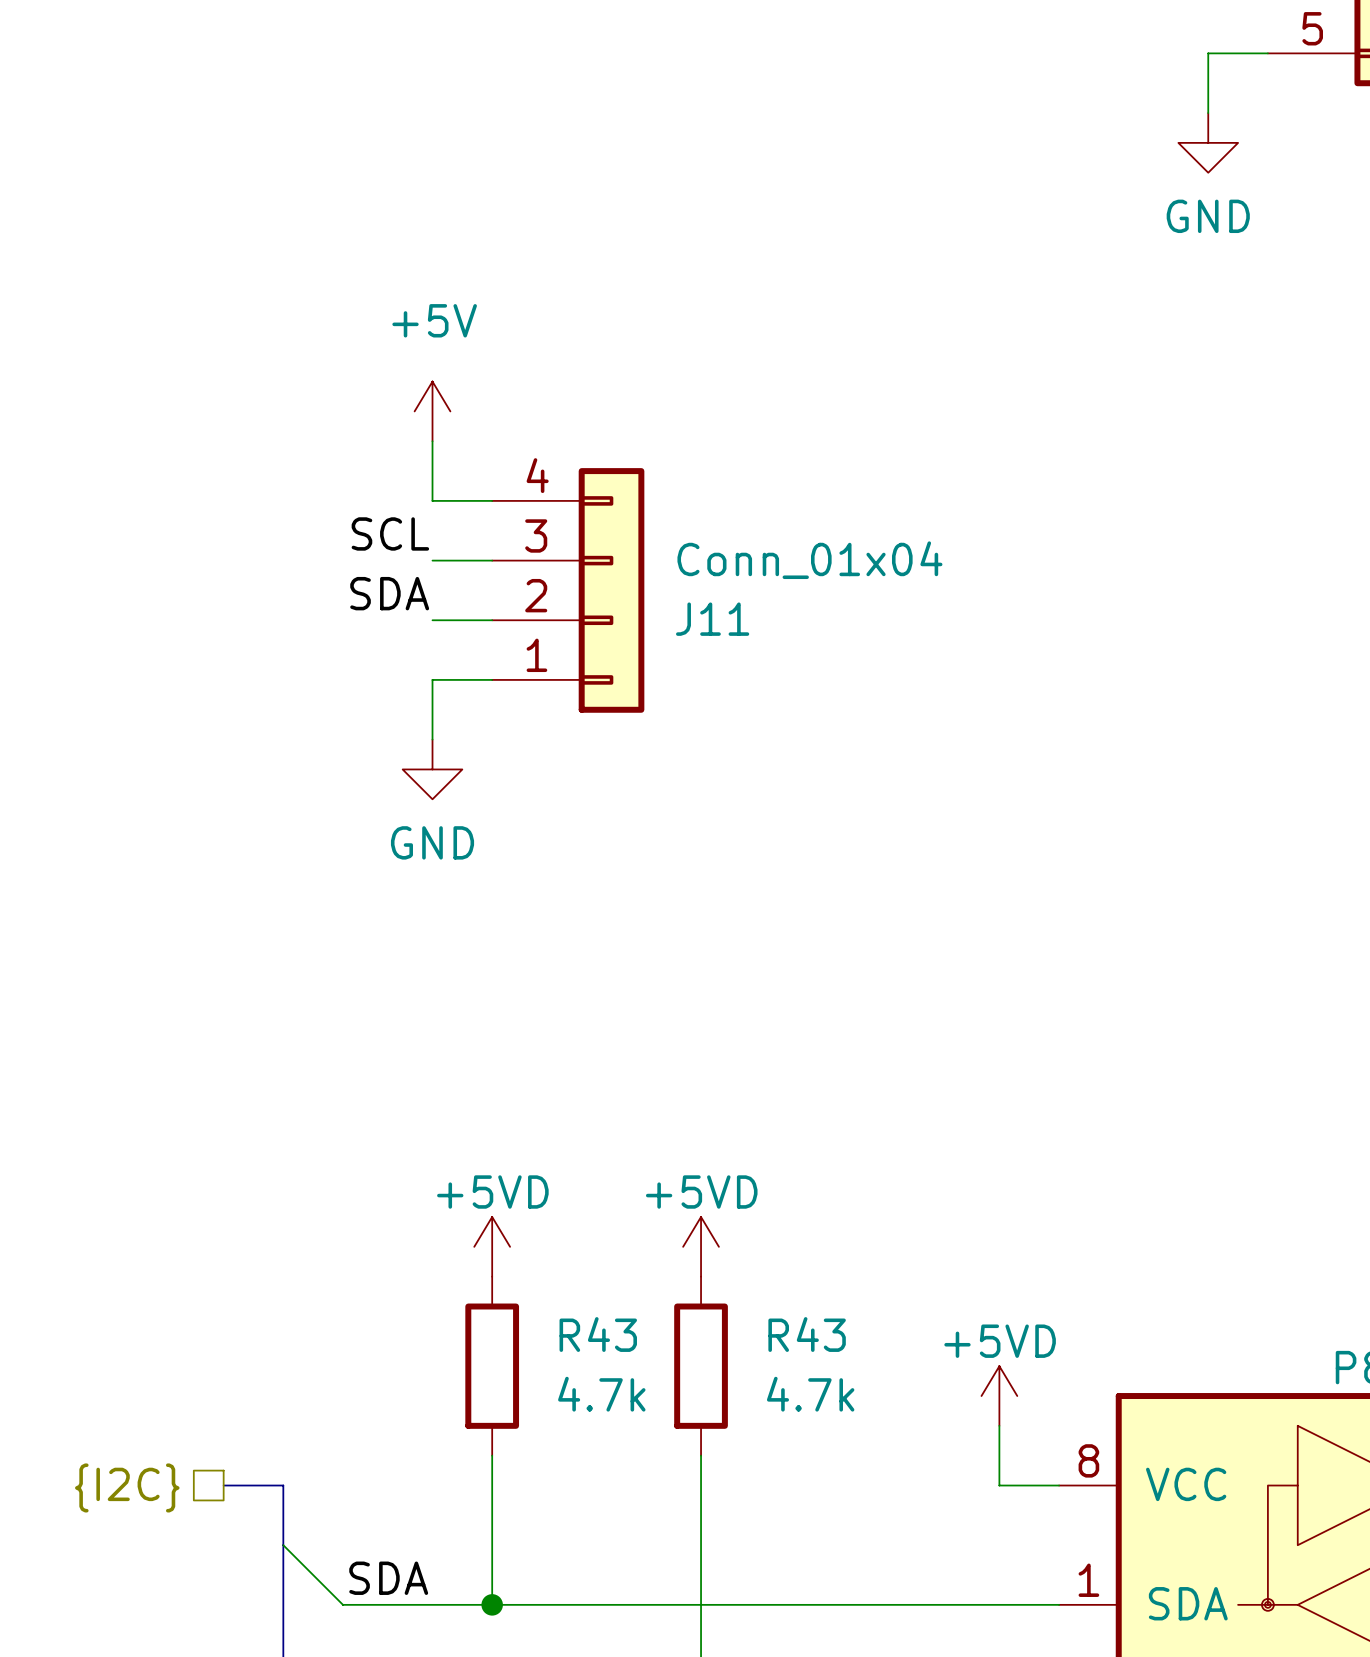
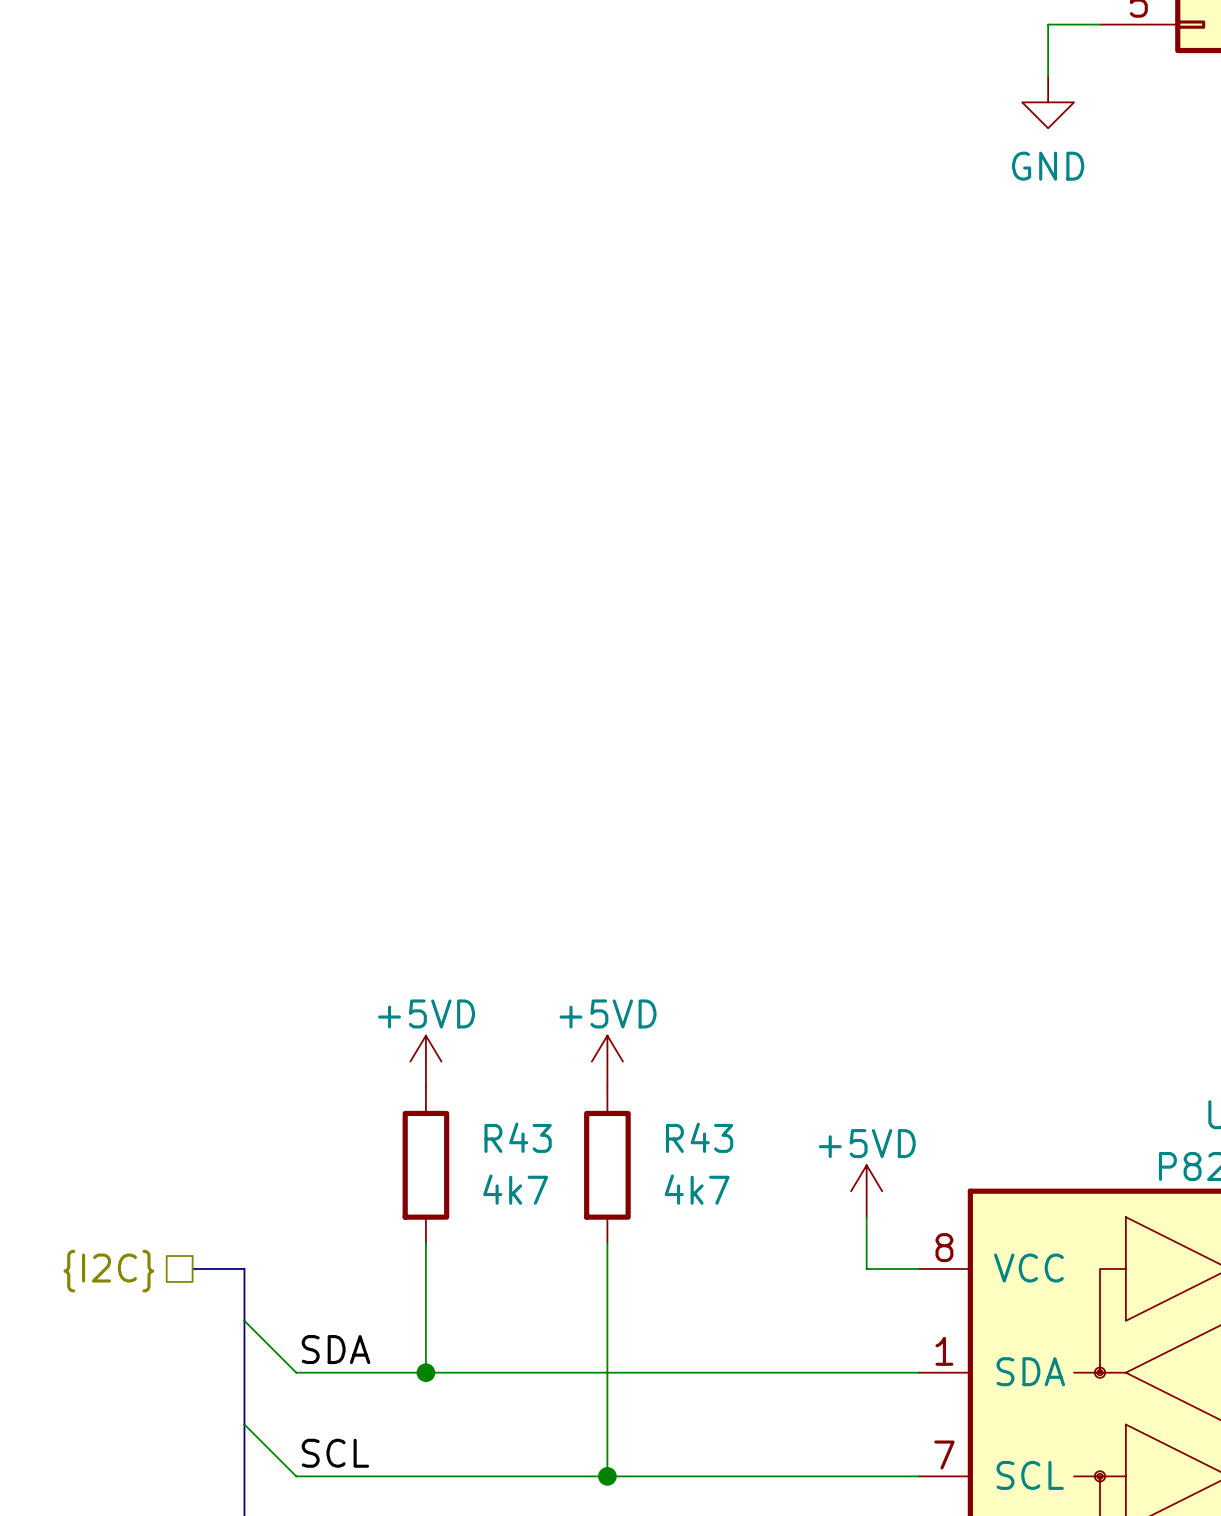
power symbol: +5V (432, 411) -> none
wire: (432, 441) (432, 500) (492, 500) -> none
label: SCL (390, 533) -> none
wire: (432, 560) (492, 560) -> none
J11: Conn_01x04 (568, 590) -> none
label: SDA (389, 593) -> none
wire: (432, 620) (492, 620) -> none
wire: (492, 679) (432, 679) (432, 739) -> none
power symbol: GND (432, 769) -> none
R43 value: 4.7k (601, 1394) -> 4k7 (515, 1189)
R43 value: 4.7k (810, 1394) -> 4k7 (697, 1189)

